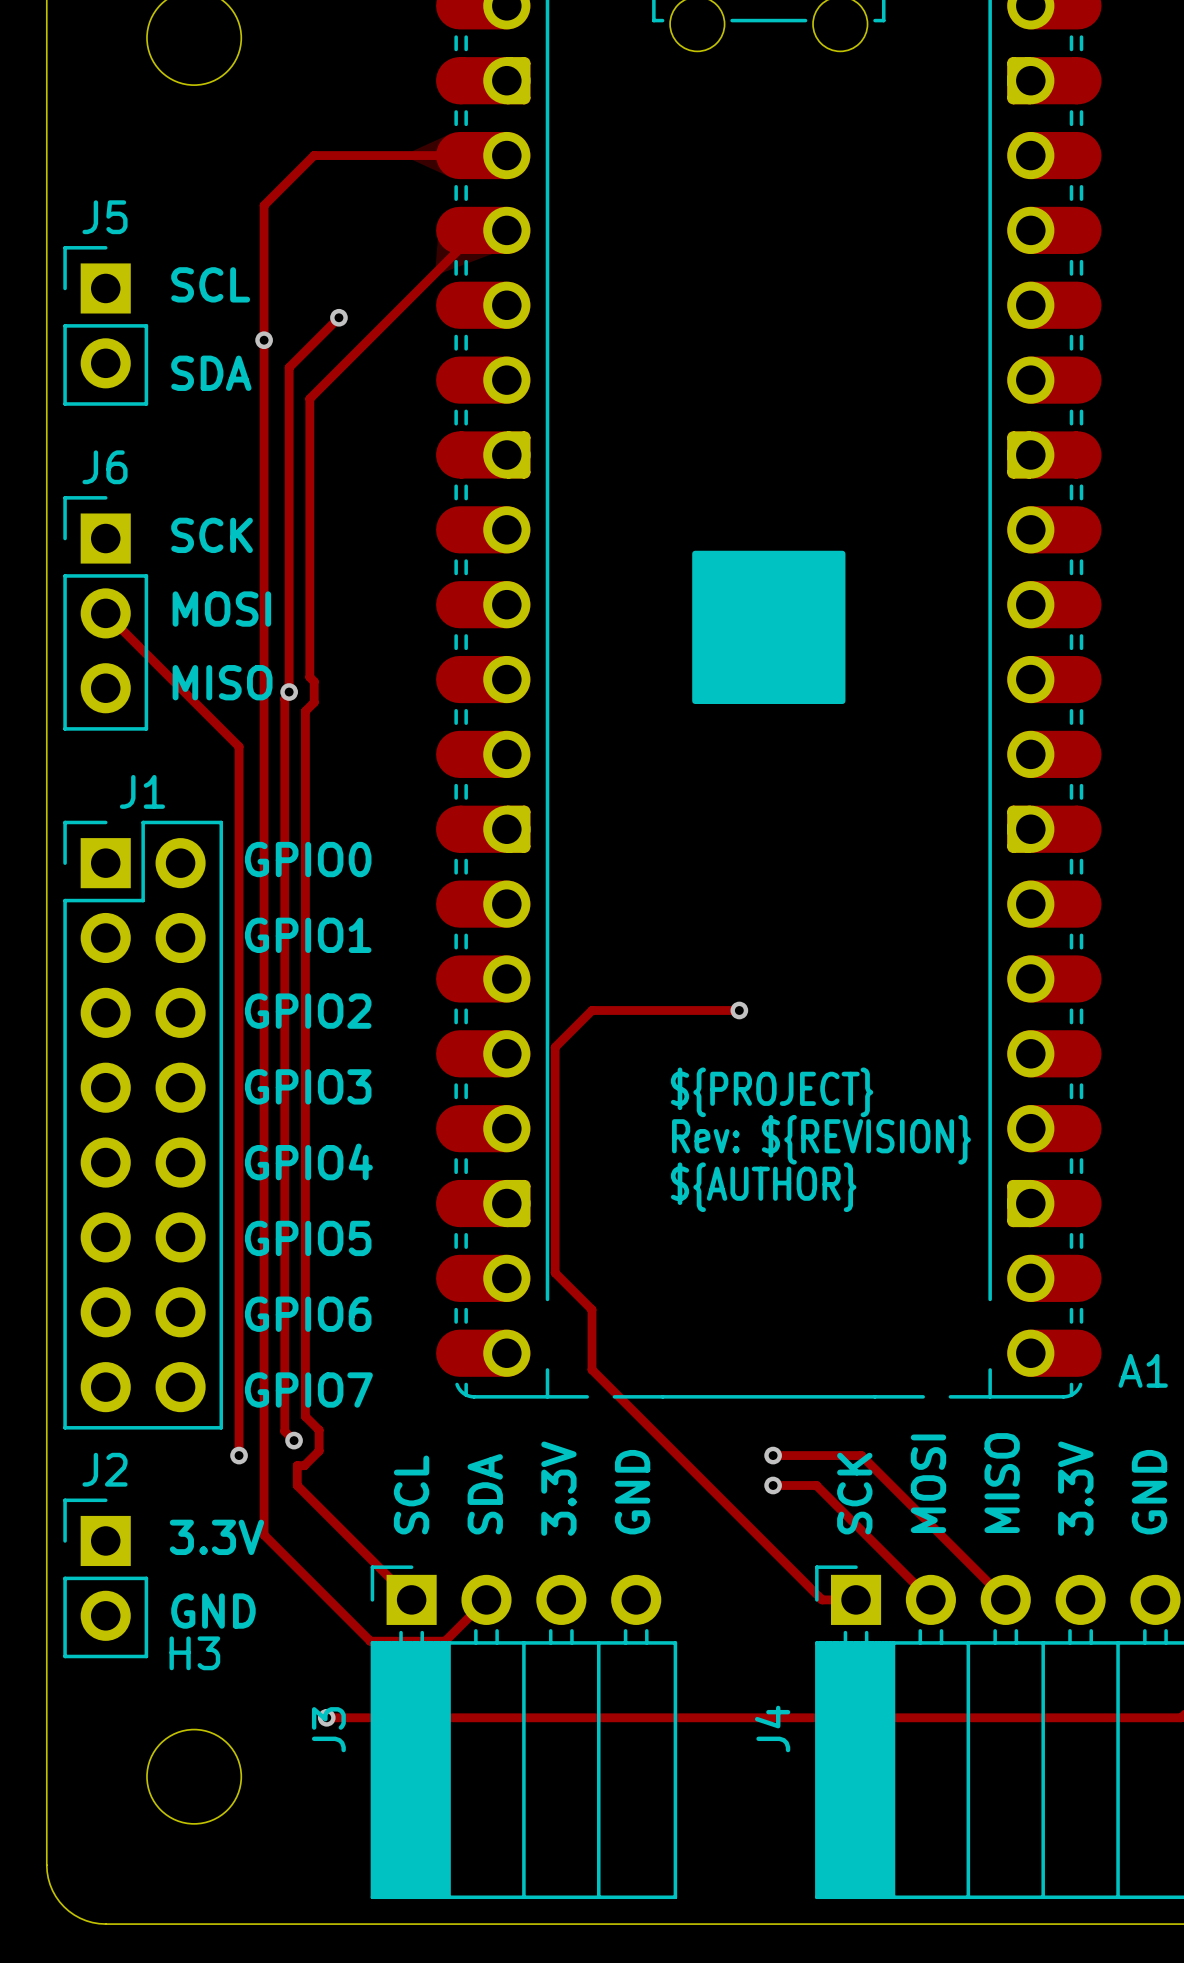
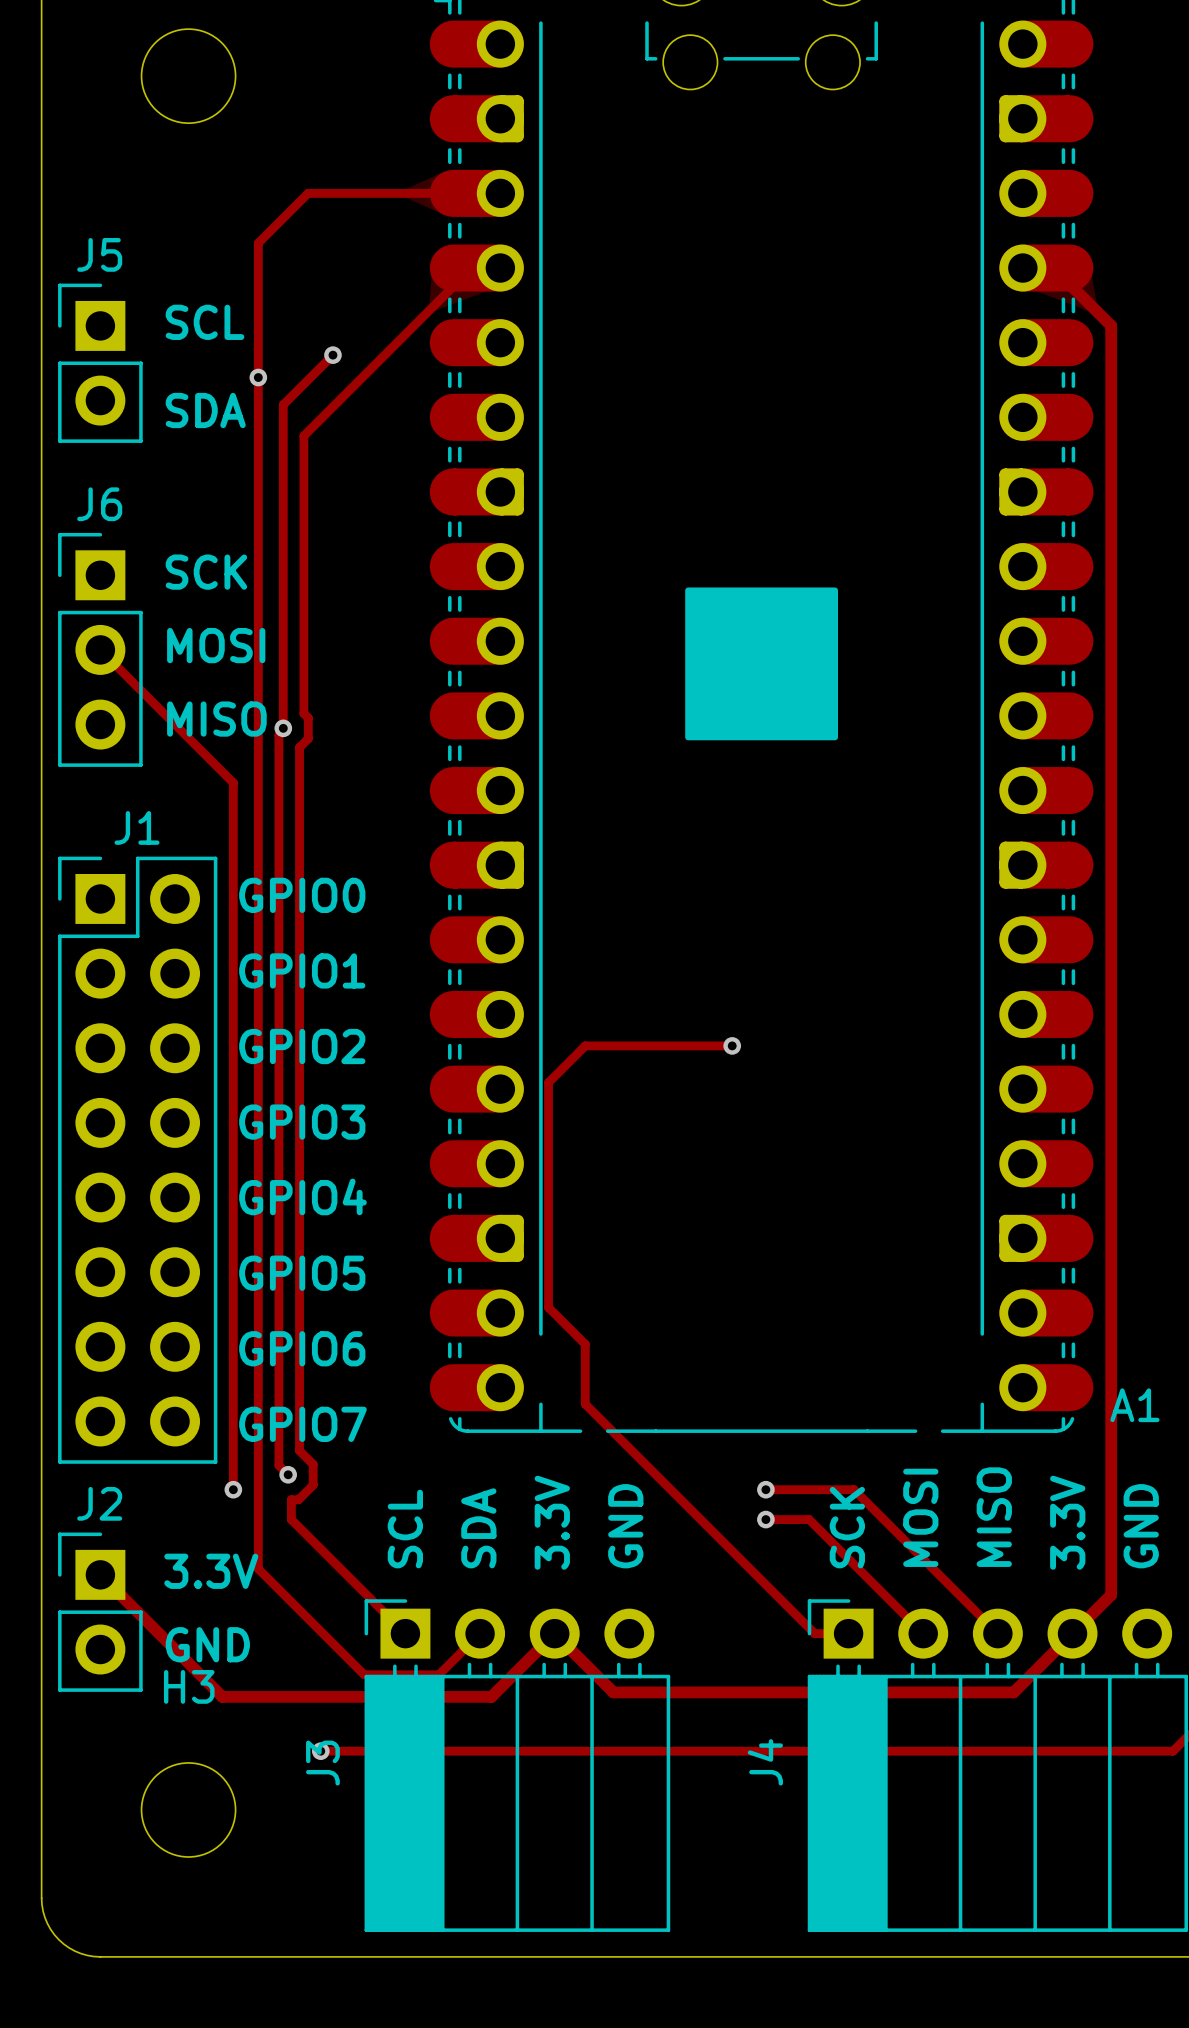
track: none -> (1053, 268) (1111, 325) (1111, 1594) (1013, 1692) (613, 1692) (554, 1633) (491, 1696) (222, 1696) (100, 1574)
text: ${PROJECT} (772, 1092) -> none
text: Rev: ${REVISION} (821, 1139) -> none
text: ${AUTHOR} (763, 1187) -> none

